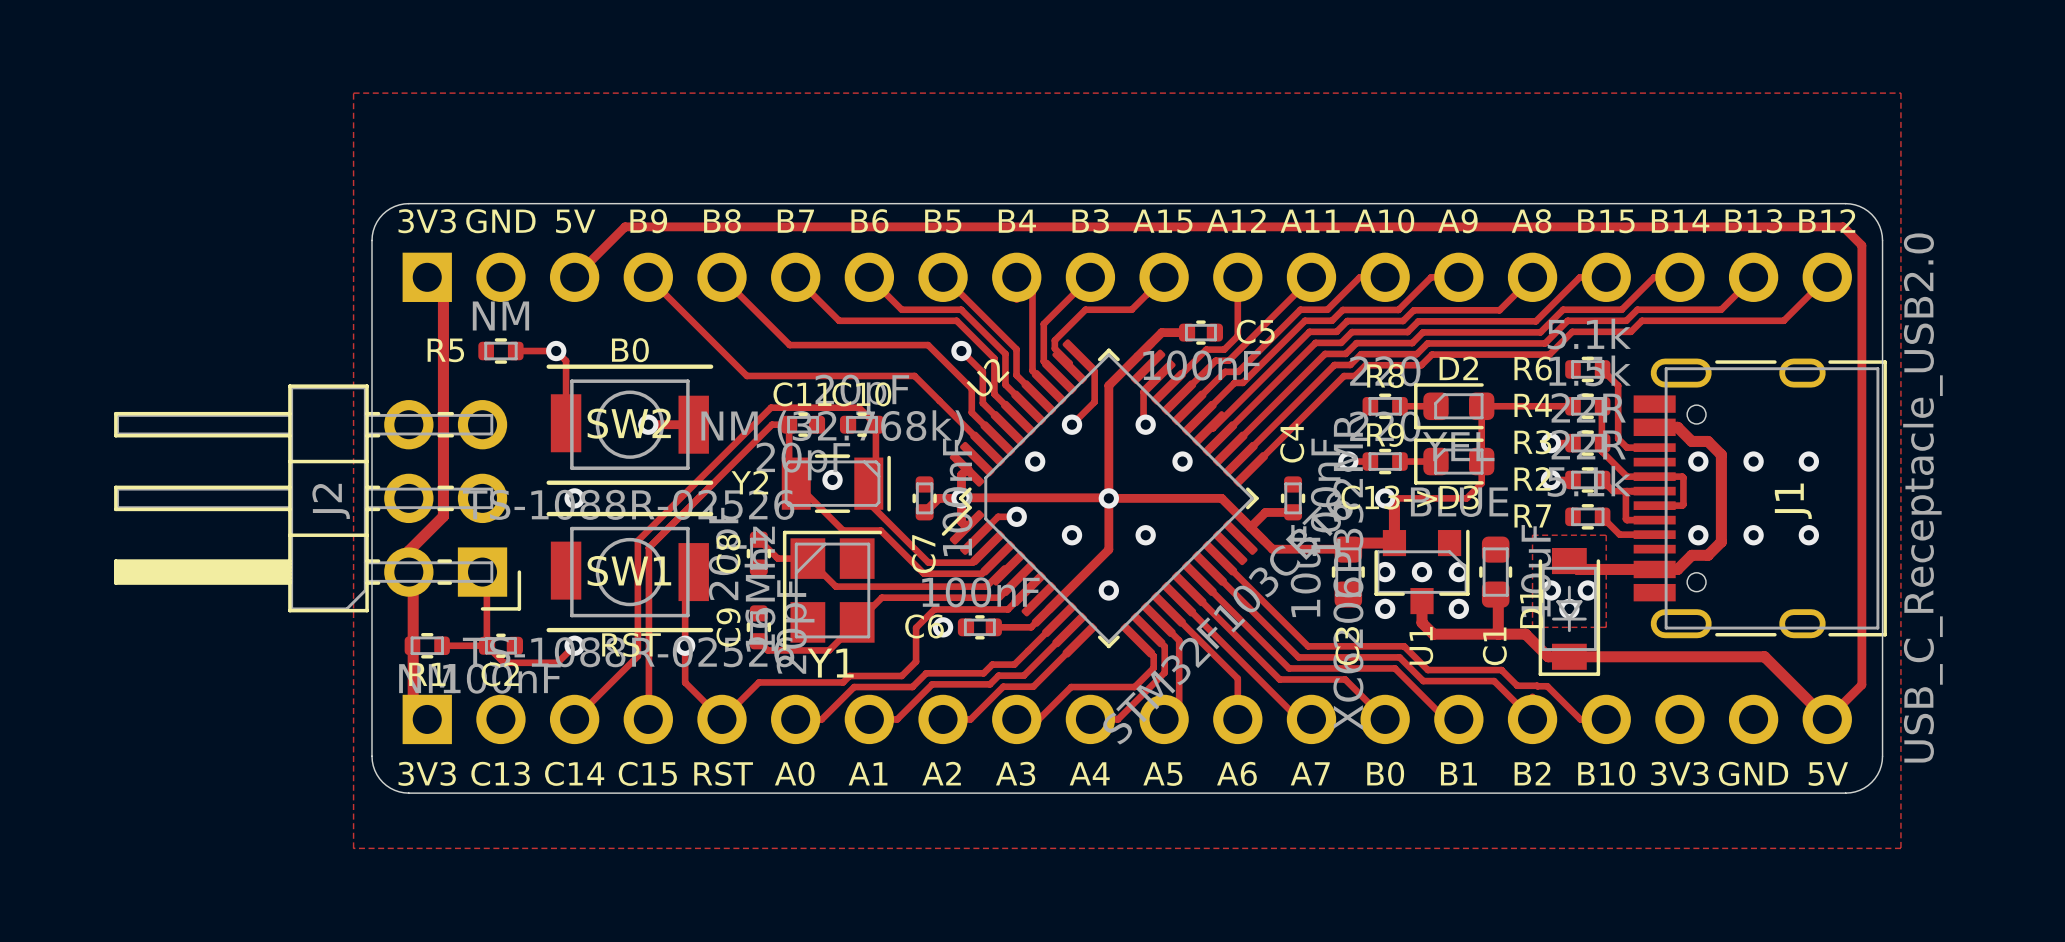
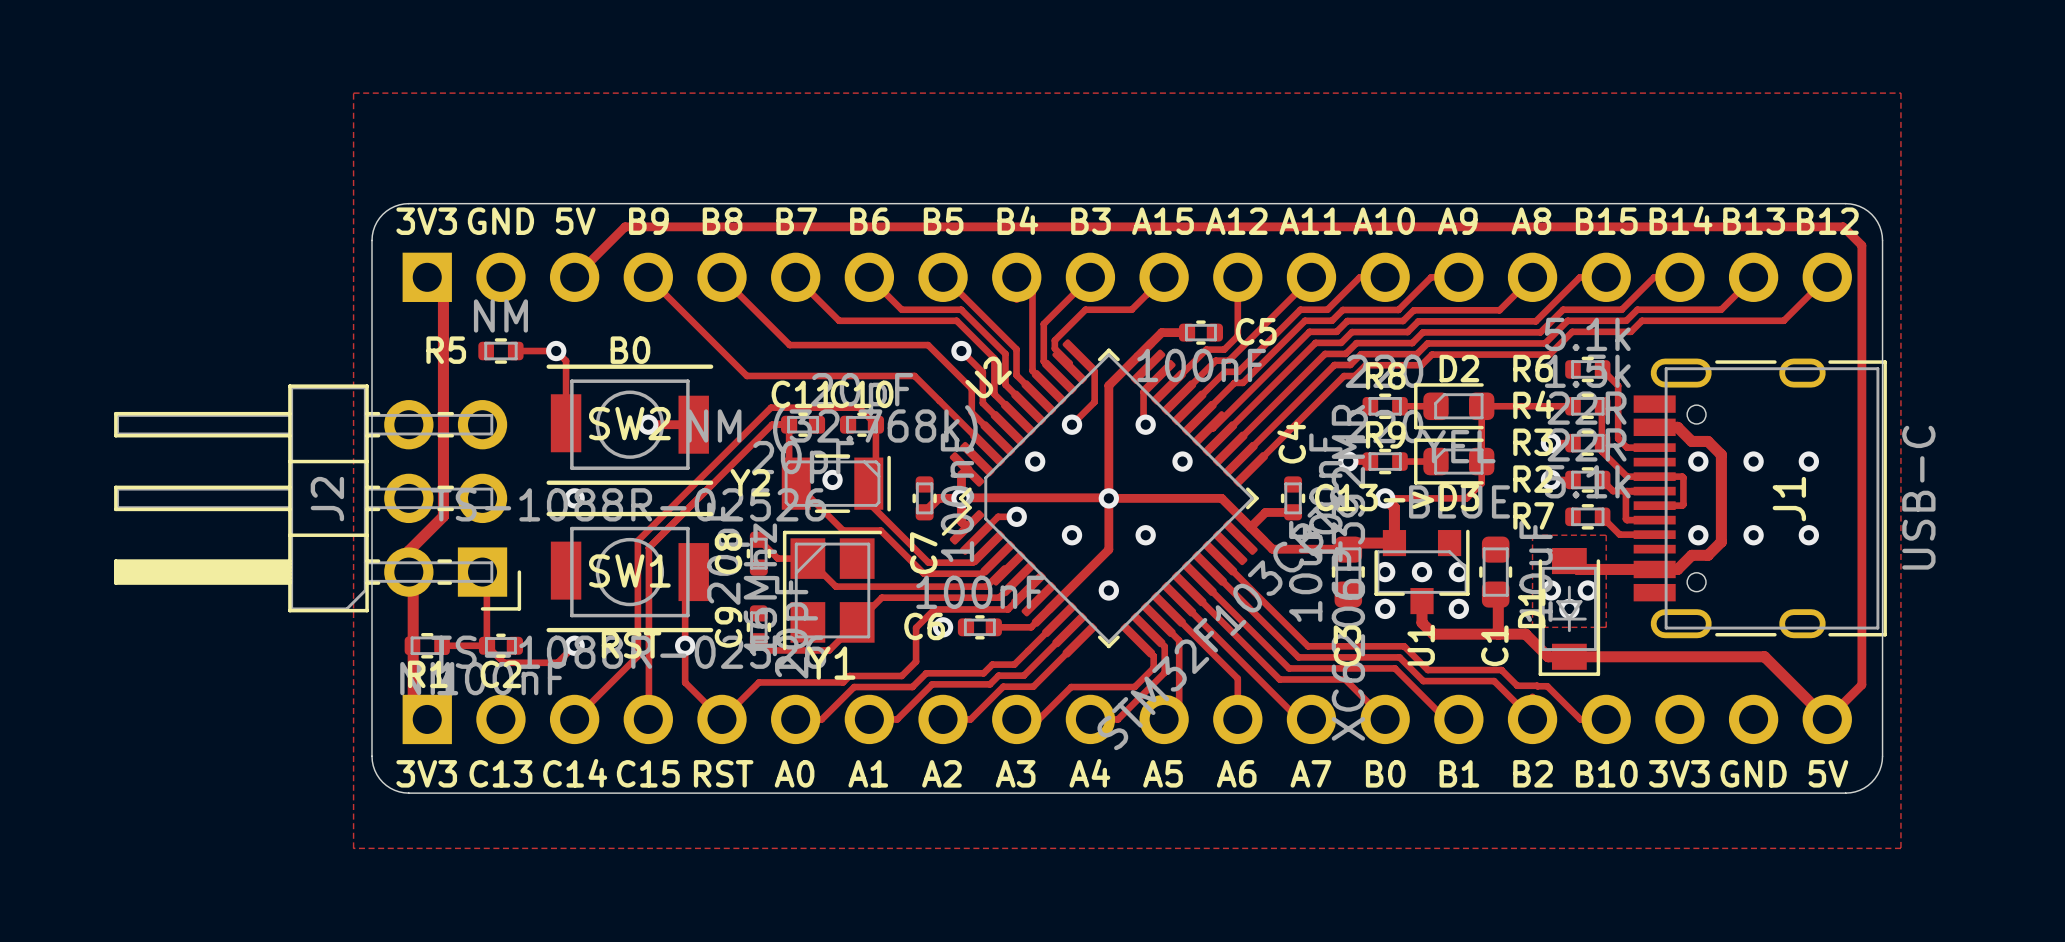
J1 value: USB_C_Receptacle_USB2.0 (1922, 497) -> USB-C (1918, 497)

